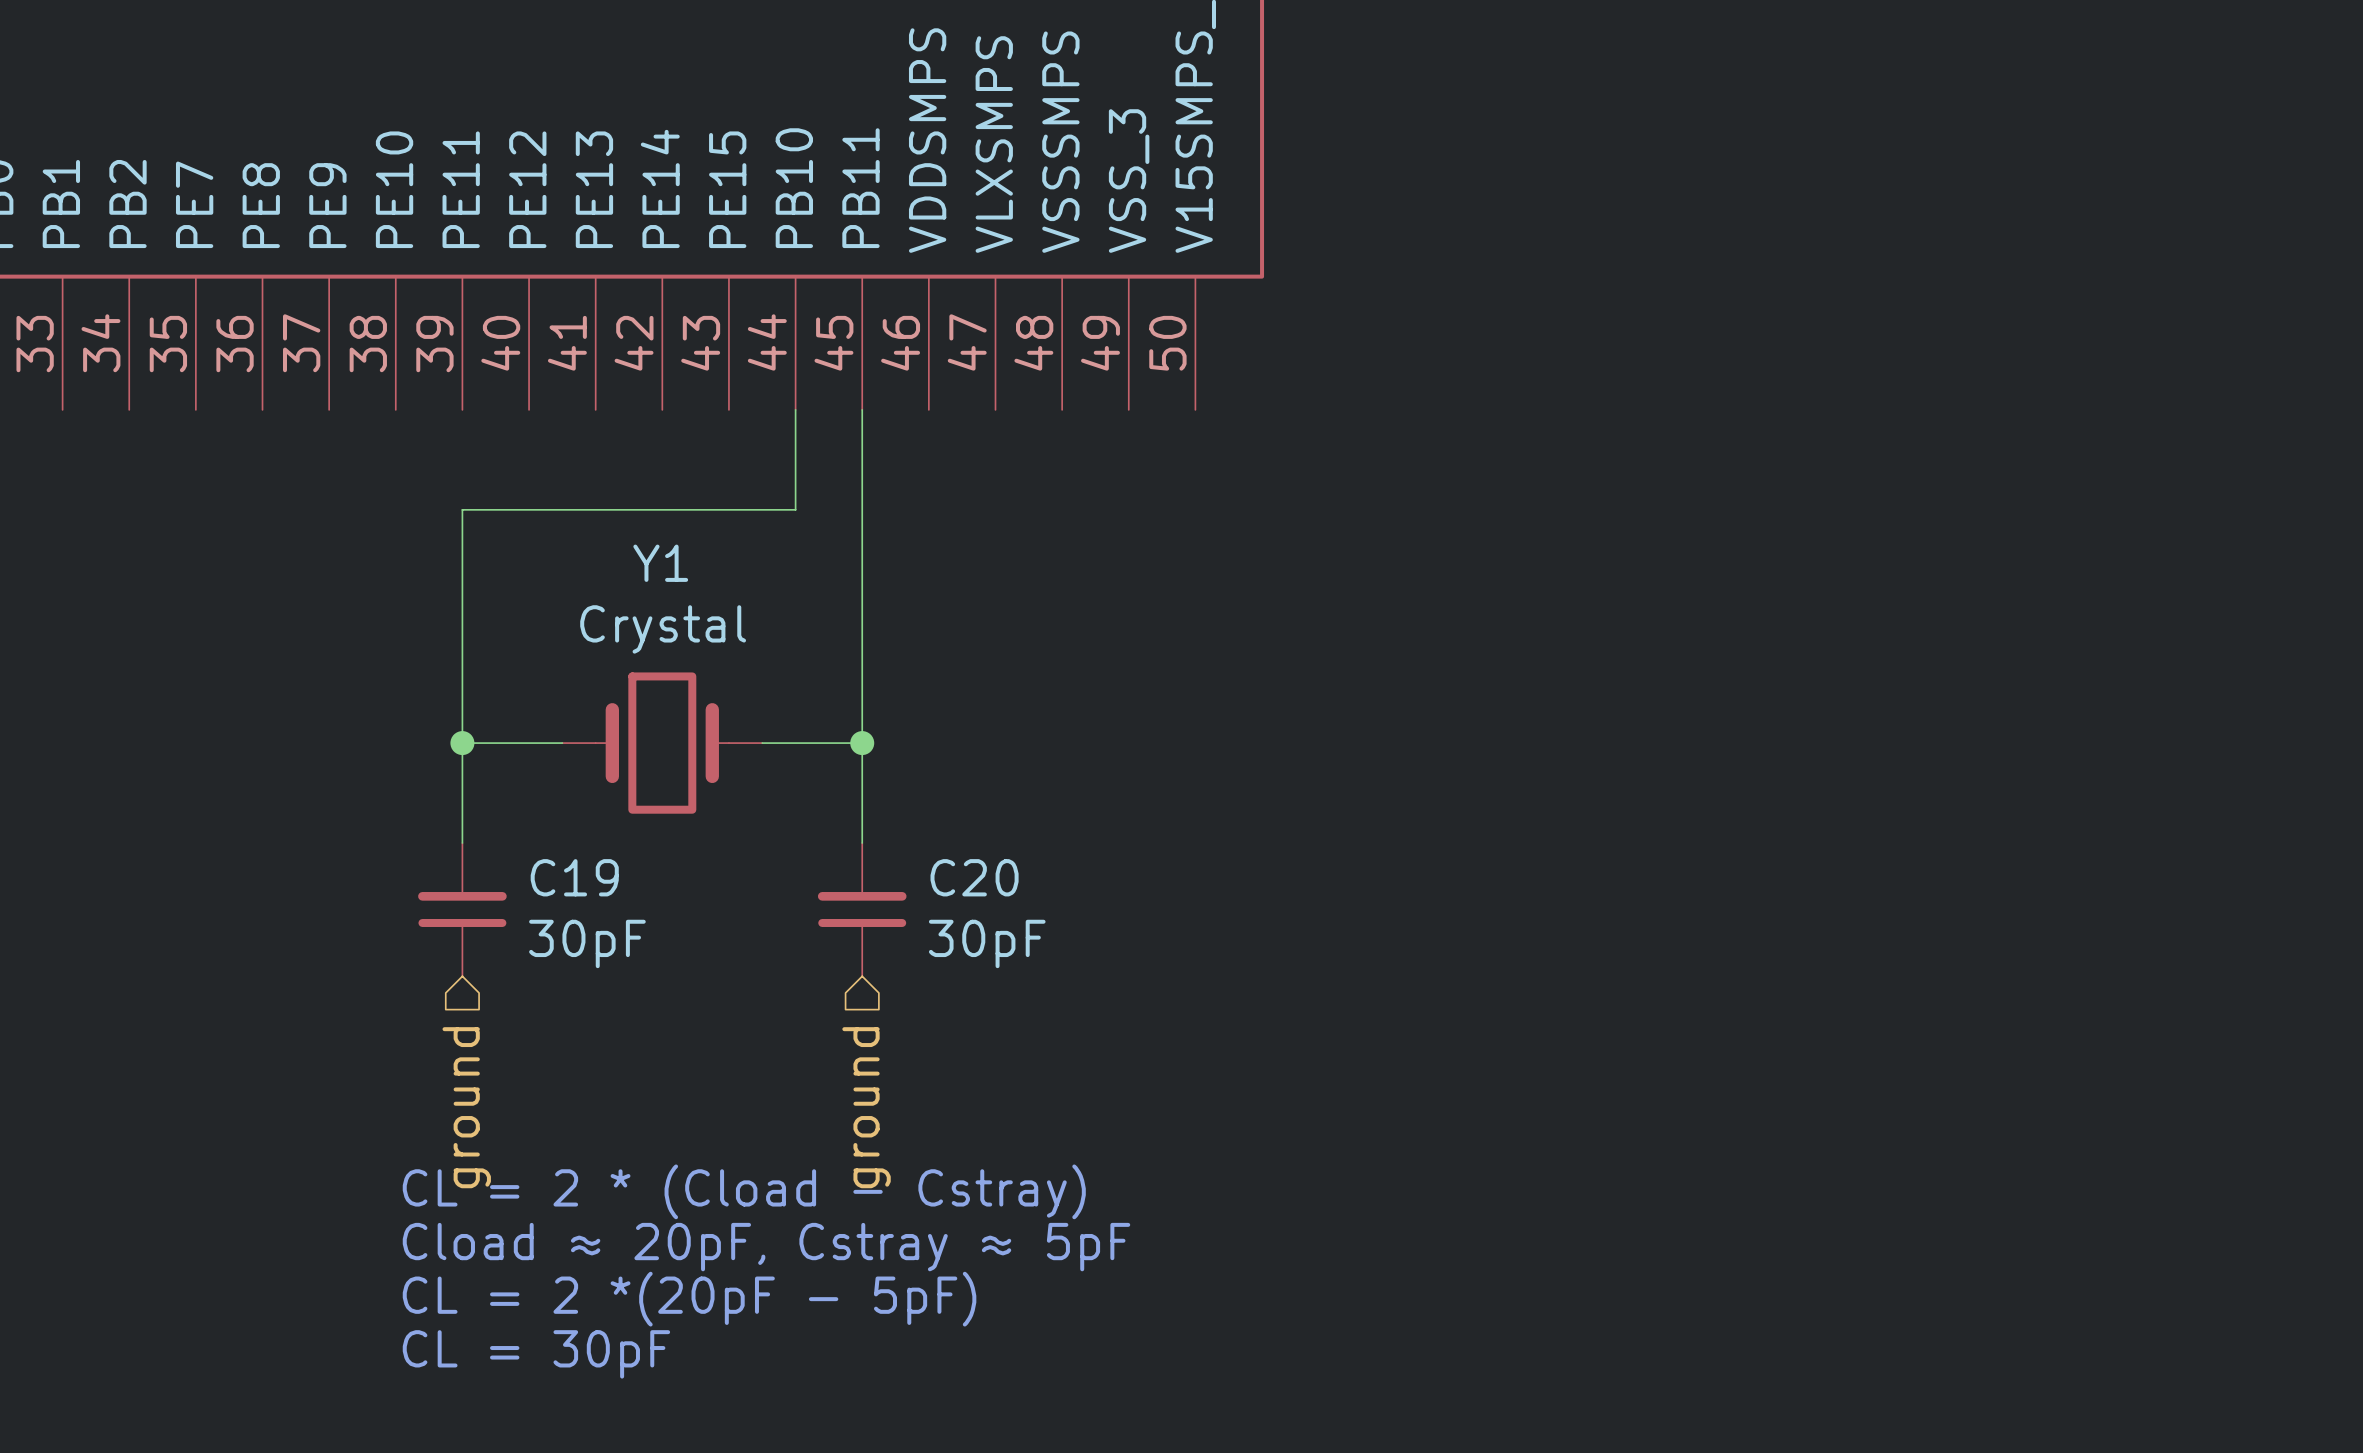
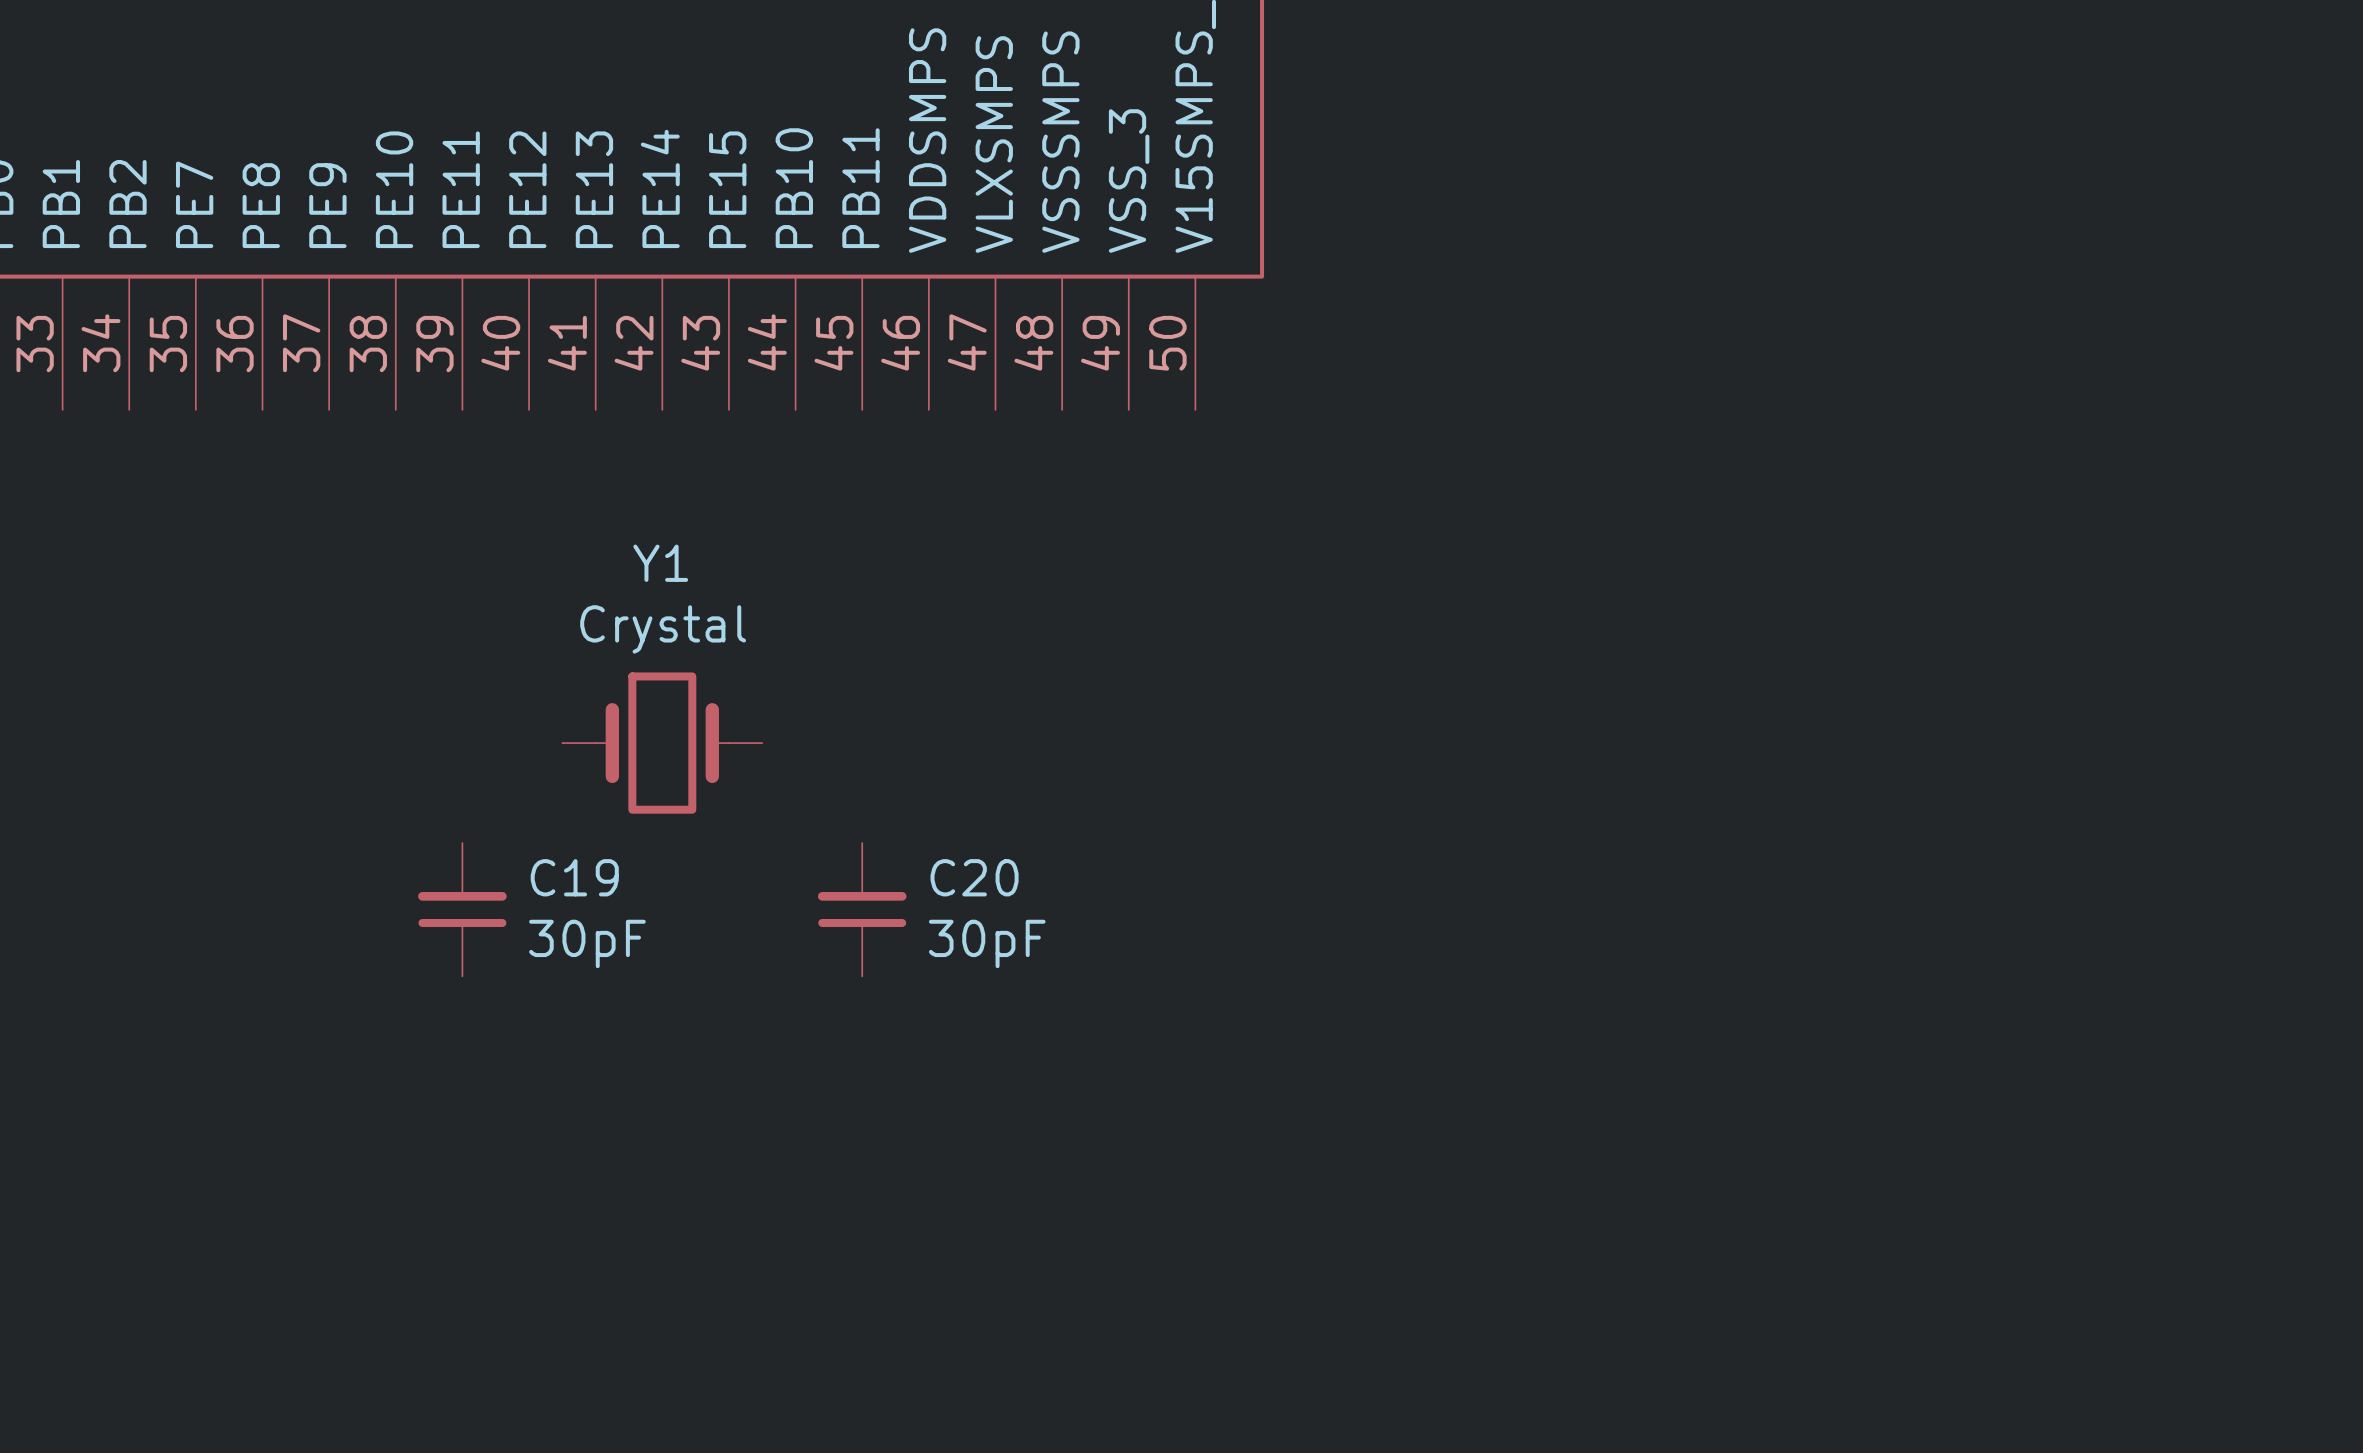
wire: (795, 409) (795, 509) (462, 509) (462, 843) -> none
wire: (862, 409) (862, 843) -> none
wire: (462, 743) (562, 743) -> none
junction: (462, 743) -> none
wire: (762, 743) (862, 743) -> none
junction: (862, 743) -> none
hierarchical label: ground (466, 1107) -> none
hierarchical label: ground (866, 1107) -> none
text: CL = 2 * (Cload - Cstray) (744, 1191) -> none
text: Cload ≈ 20pF, Cstray ≈ 5pF (766, 1247) -> none
text: CL = 2 *(20pF - 5pF) (689, 1299) -> none
text: CL = 30pF (536, 1354) -> none

